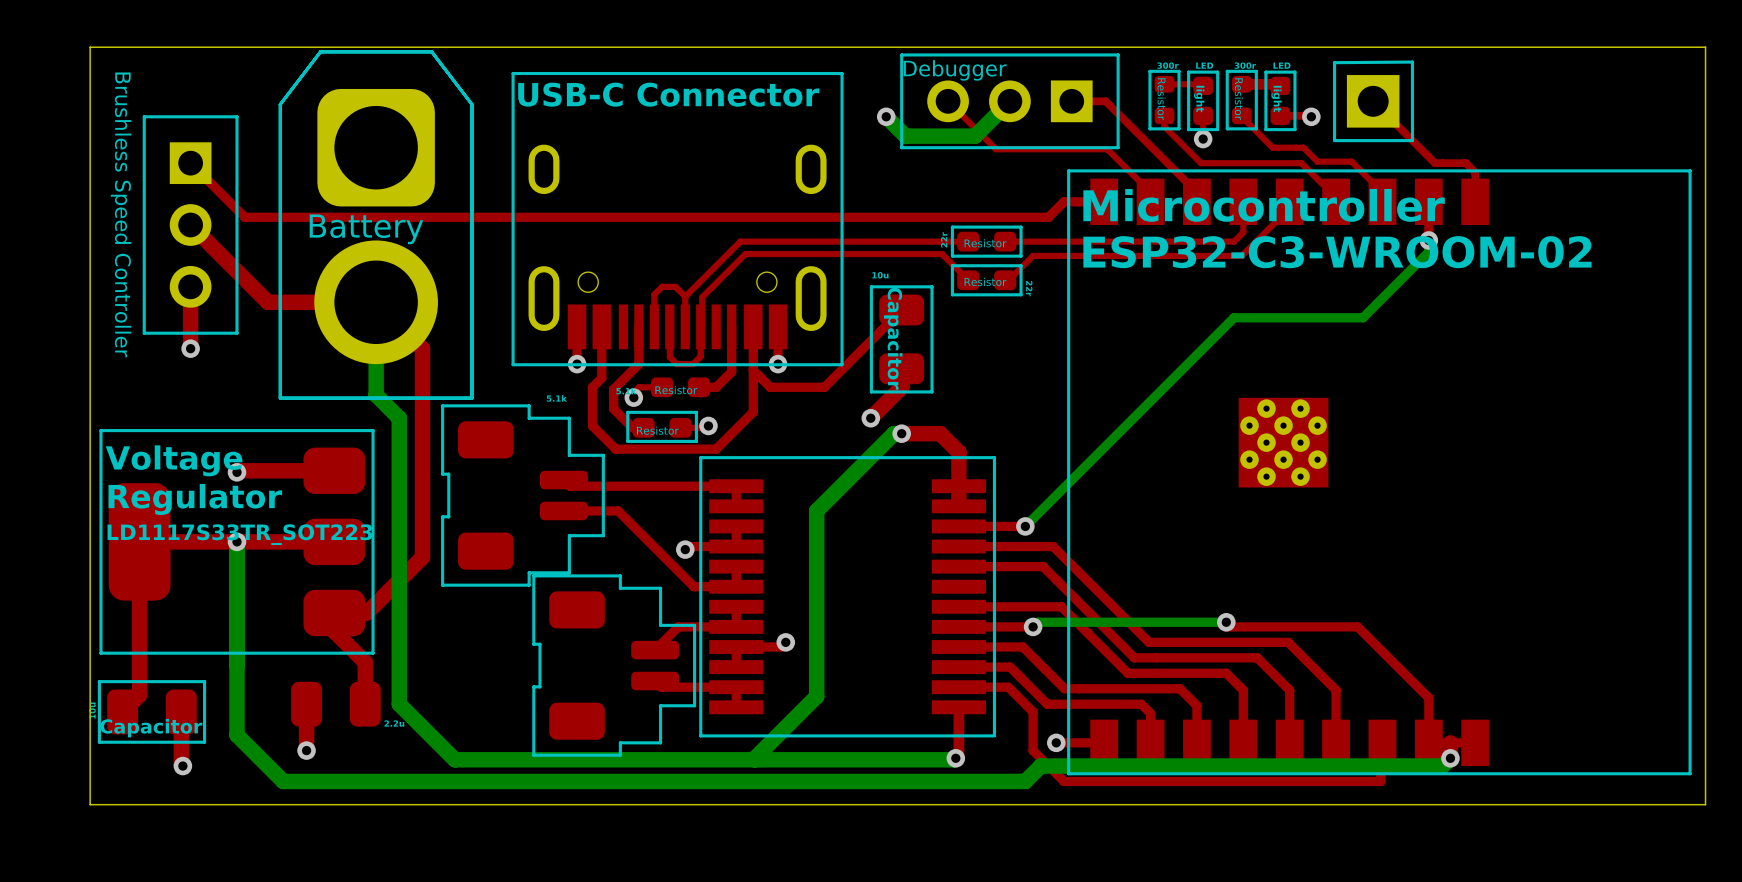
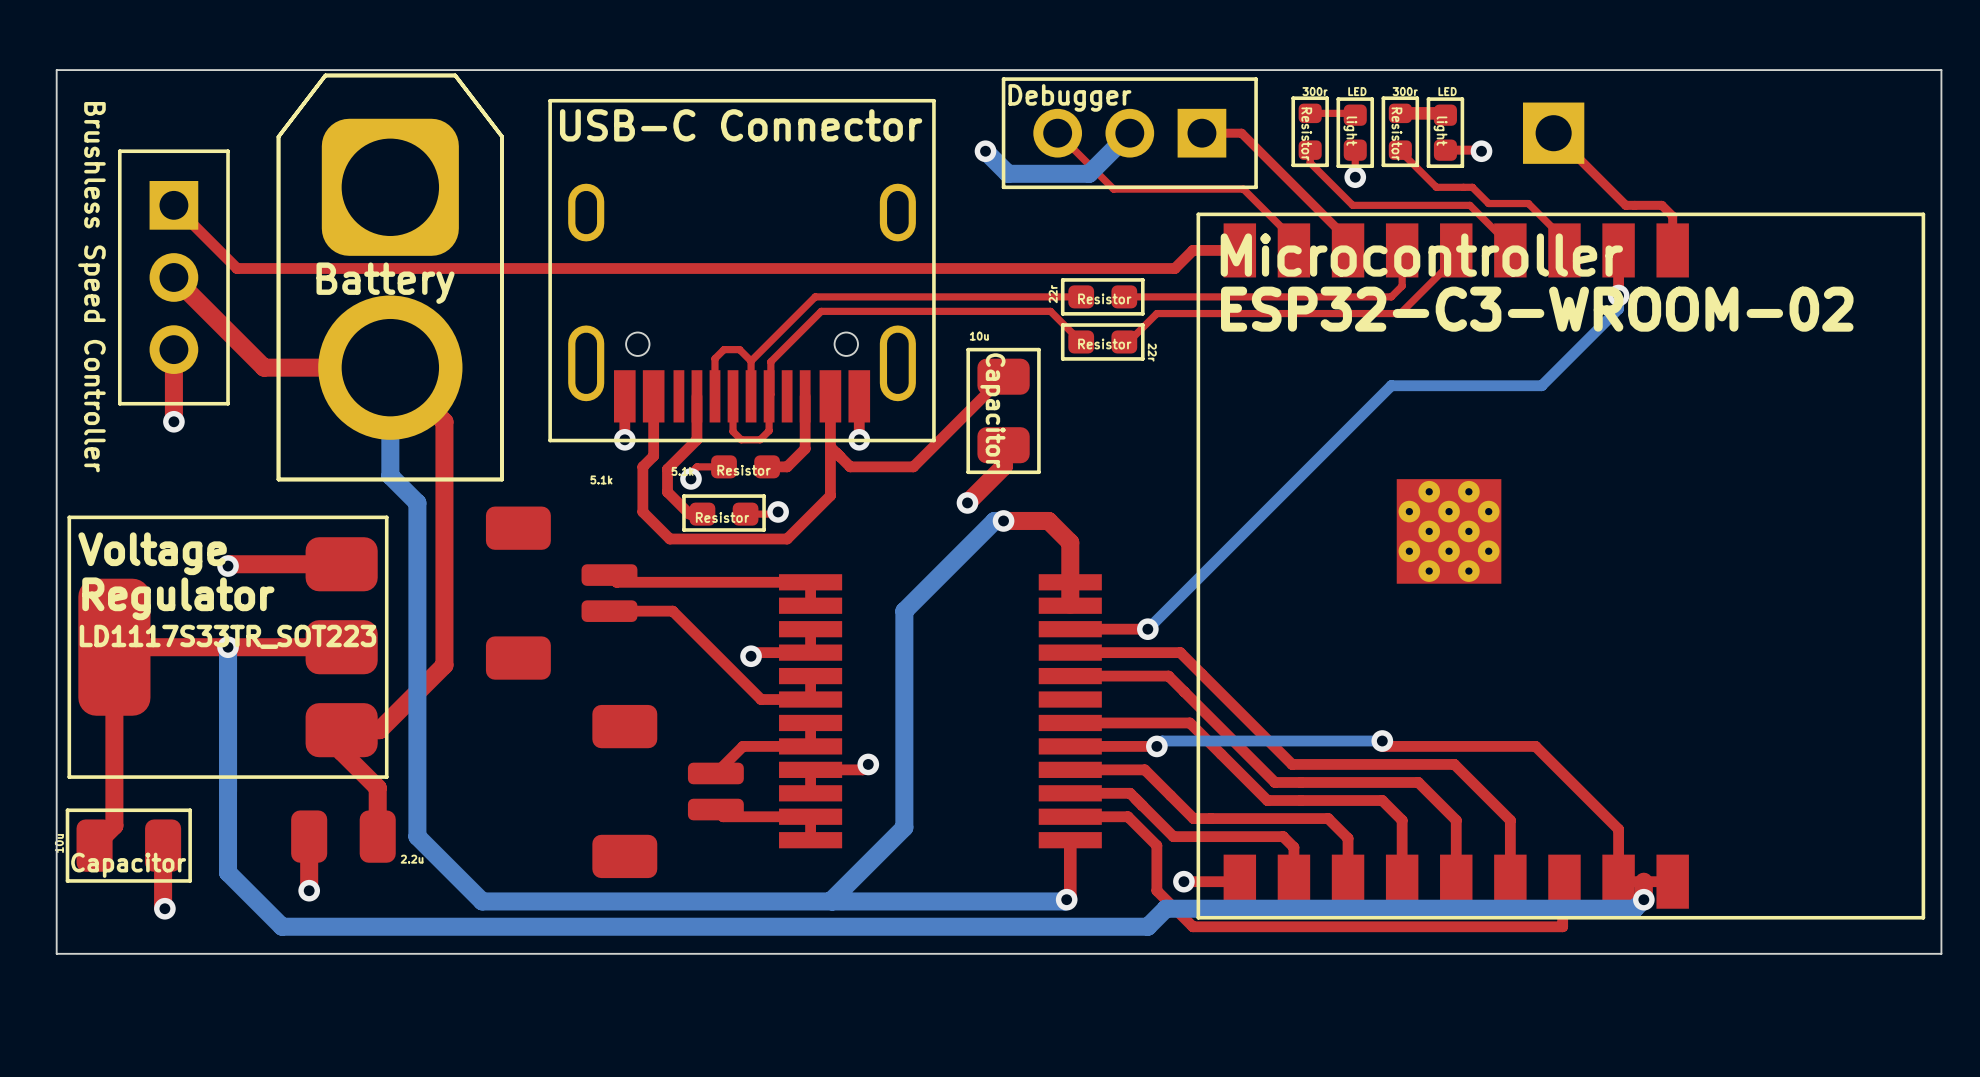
line: (1334, 139) (1334, 62) (1412, 62) (1412, 140) (1334, 140) -> none
line: (529, 405) (529, 418) (569, 418) (569, 455) (603, 455) (603, 535) (569, 535) (569, 572) (529, 572) (529, 585) (442, 585) (442, 516) (448, 516) (448, 474) (442, 474) (442, 405) (529, 405) -> none
line: (620, 575) (620, 588) (660, 588) (660, 625) (694, 625) (694, 705) (660, 705) (660, 742) (620, 742) (620, 755) (533, 755) (533, 686) (539, 686) (539, 644) (533, 644) (533, 575) (620, 575) -> none
line: (994, 735) (994, 457) (700, 457) (700, 735) (994, 735) -> none

